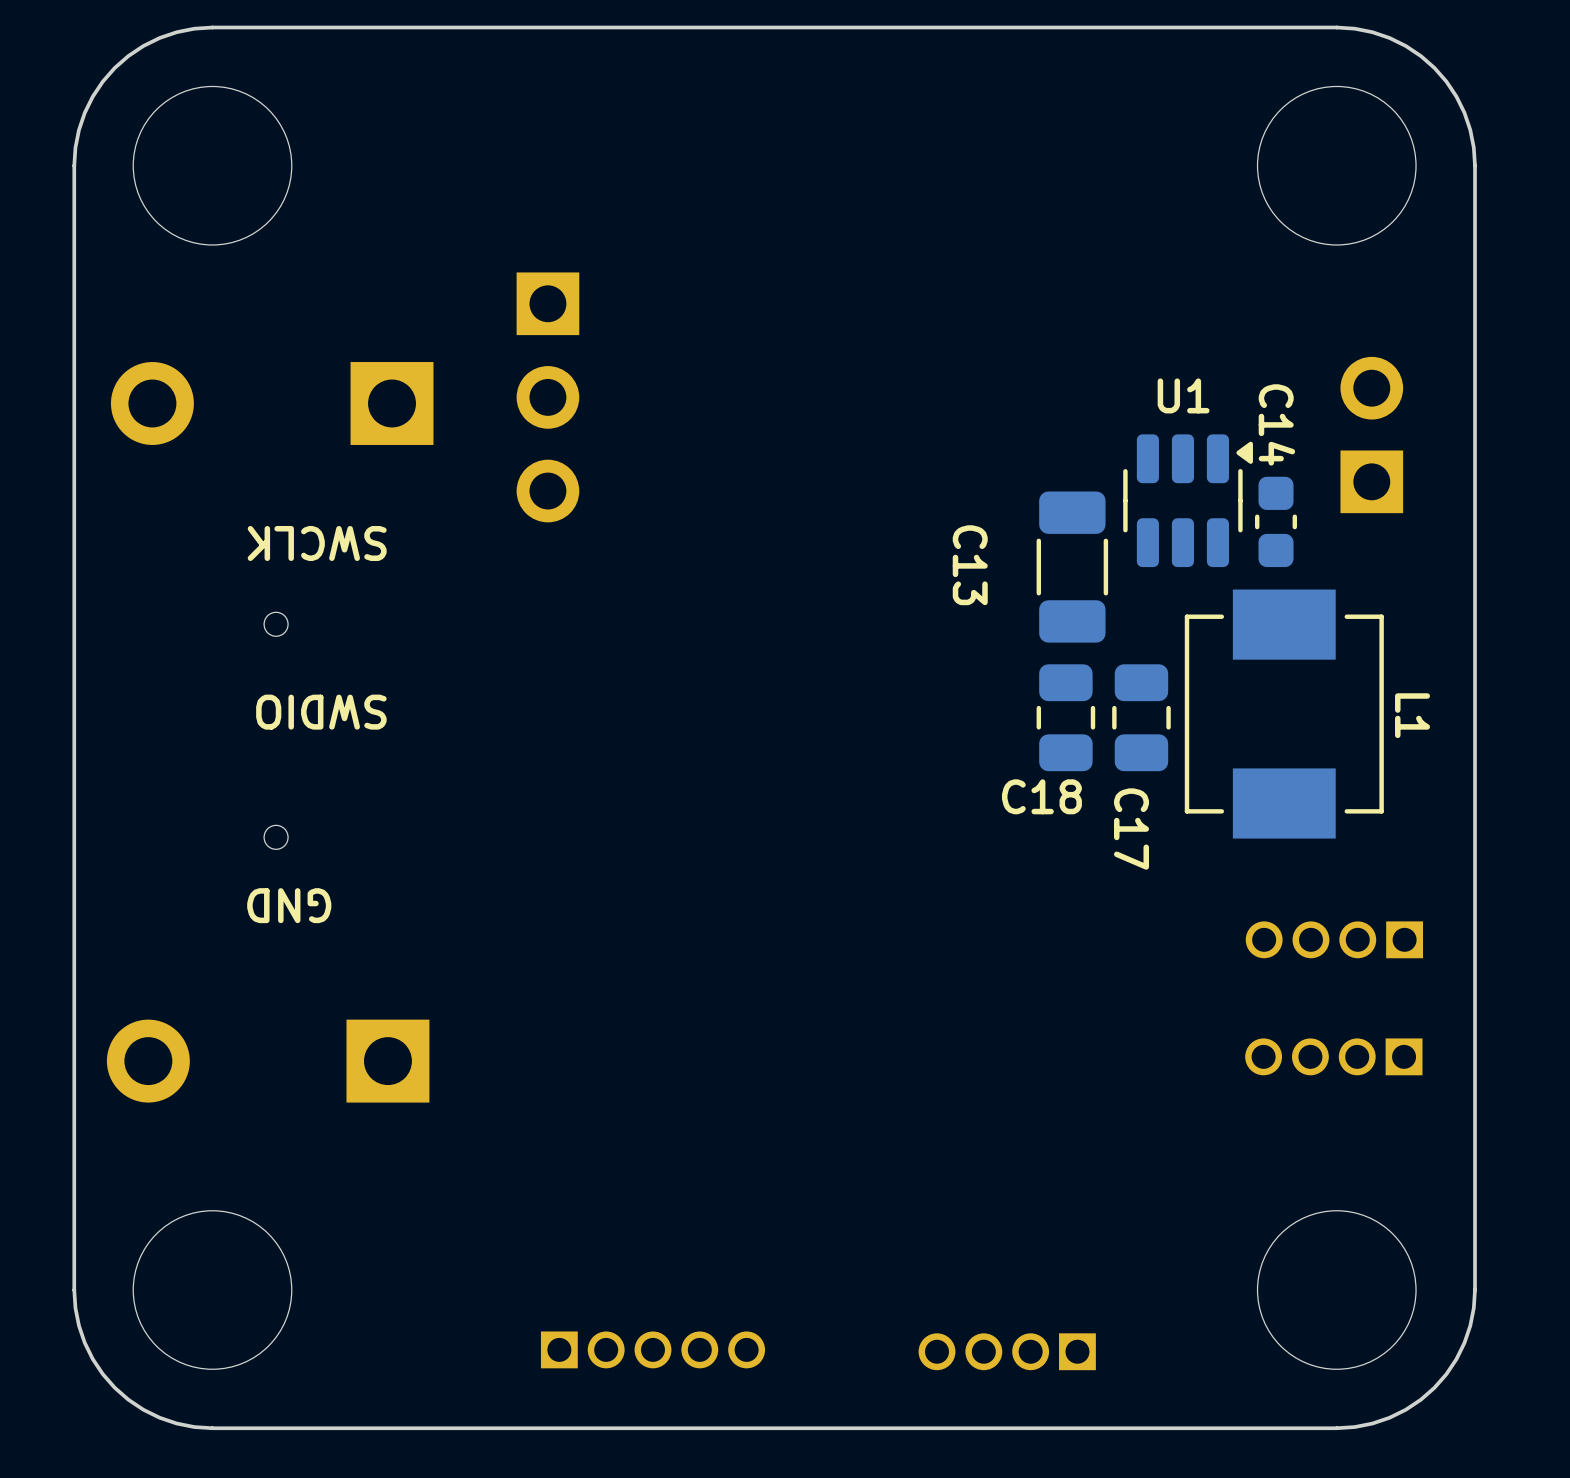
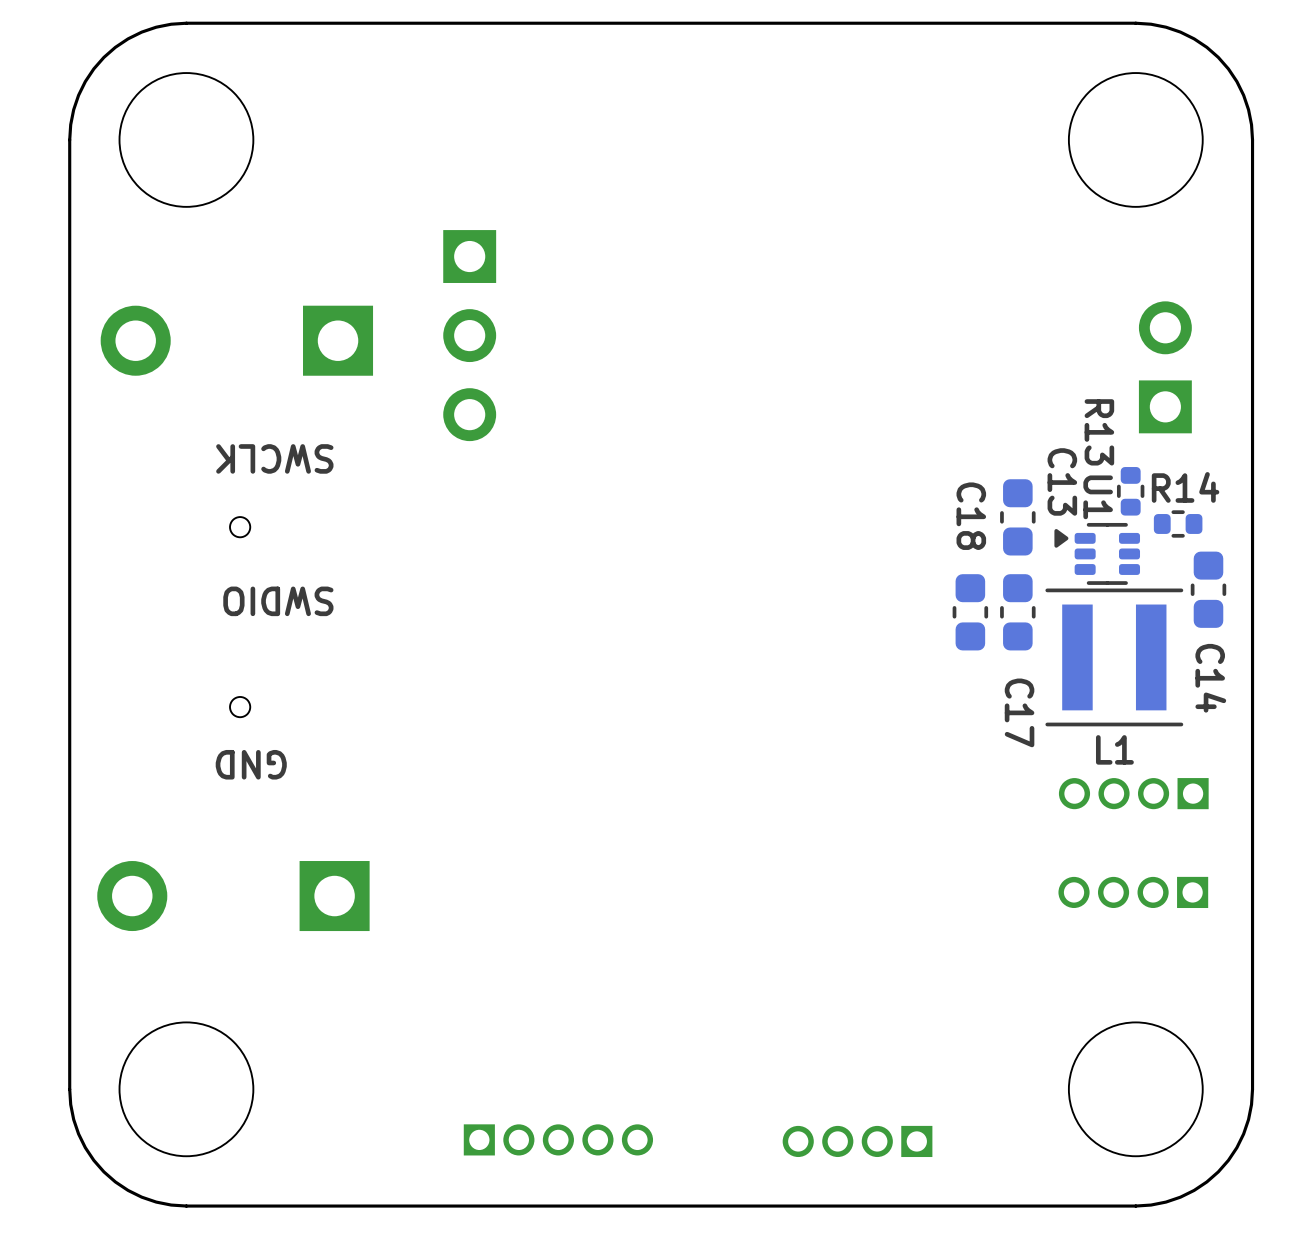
C14 name position: C14 (1276, 424) -> C14 (1210, 678)
U1 footprint: [1123, 434, 1253, 568] -> [1054, 522, 1141, 585]
C13 footprint: [1036, 491, 1109, 643] -> [1000, 479, 1036, 556]
C14 position: (1276, 521) -> (1208, 589)
C13 name position: C13 (970, 565) -> C13 (1062, 481)
R13: none -> (1130, 491)
L1 footprint: [1184, 589, 1384, 839] -> [1045, 588, 1184, 727]
R14: none -> (1178, 523)
C18 footprint: [1036, 664, 1096, 772] -> [952, 574, 989, 651]
C17 footprint: [1112, 664, 1171, 772] -> [1000, 574, 1036, 651]
L1 name position: L1 (1412, 715) -> L1 (1114, 749)
C18 name position: C18 (1041, 796) -> C18 (971, 516)

